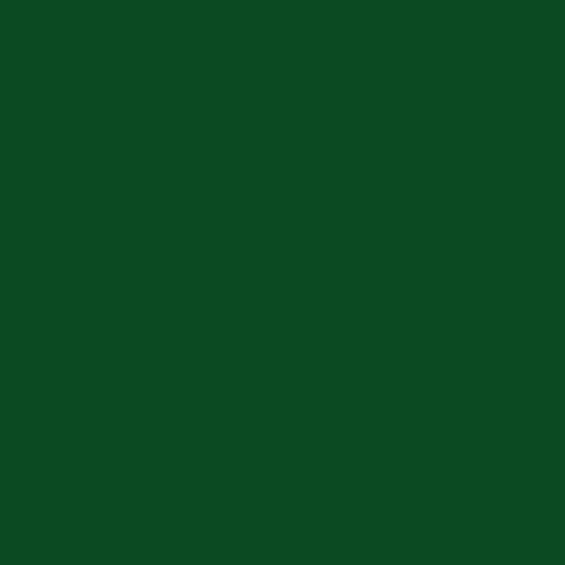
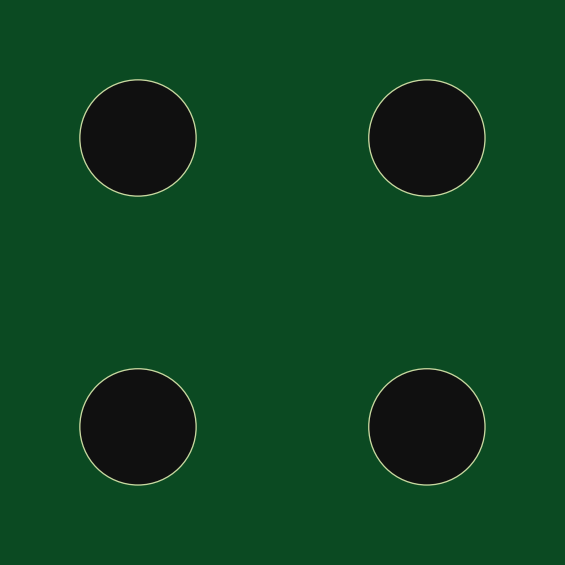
part: none -> (137, 137)
part: none -> (426, 137)
part: none -> (137, 426)
part: none -> (426, 426)

